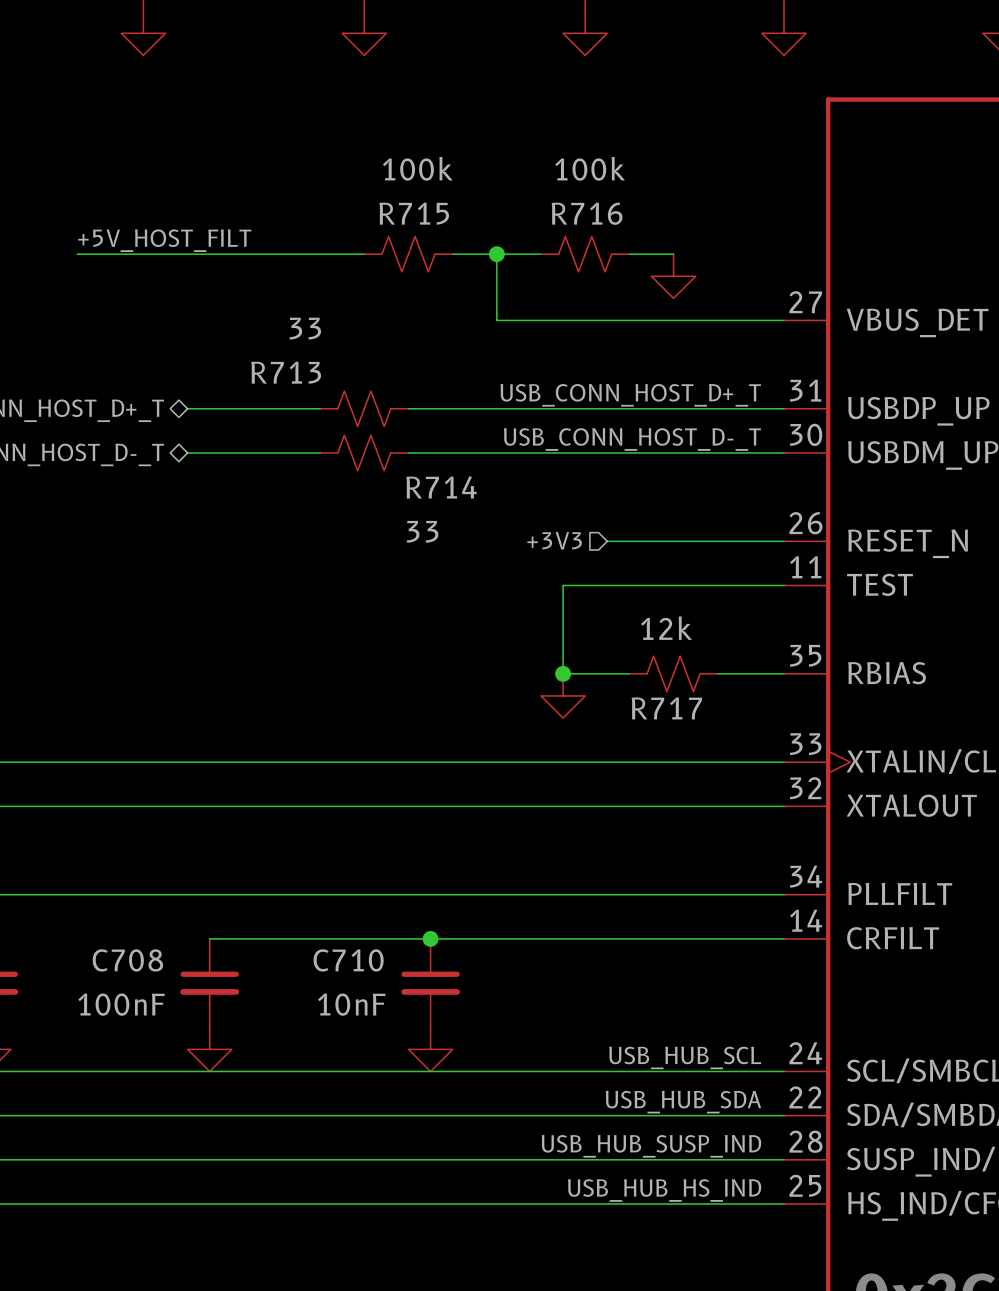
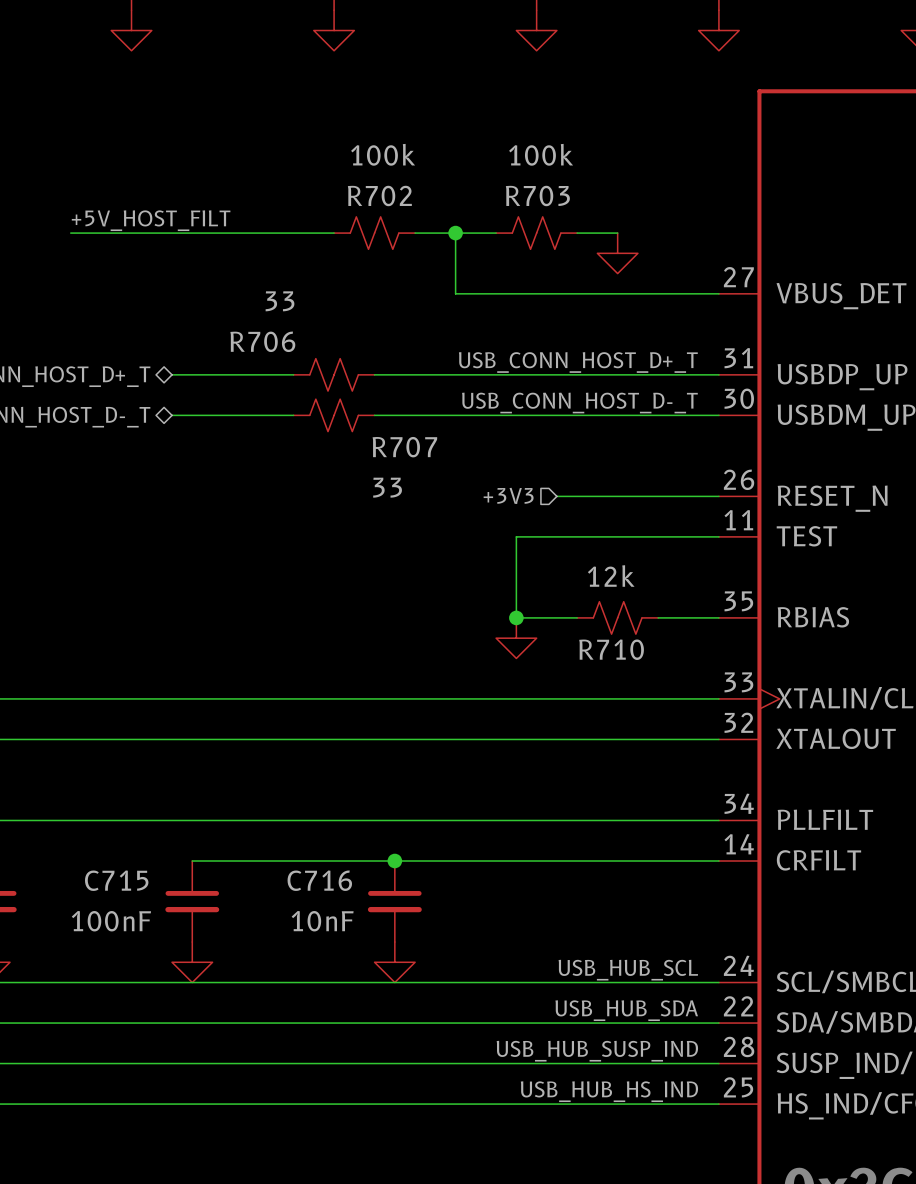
R715 name: R715 (414, 213) -> R702 (379, 195)
R716 name: R716 (587, 213) -> R703 (537, 195)
R713 name: R713 (286, 372) -> R706 (262, 341)
R714 name: R714 (441, 487) -> R707 (404, 447)
R717 name: R717 (666, 708) -> R710 (611, 649)
C708 name: C708 (127, 960) -> C715 (116, 880)
C710 name: C710 (348, 960) -> C716 (319, 880)

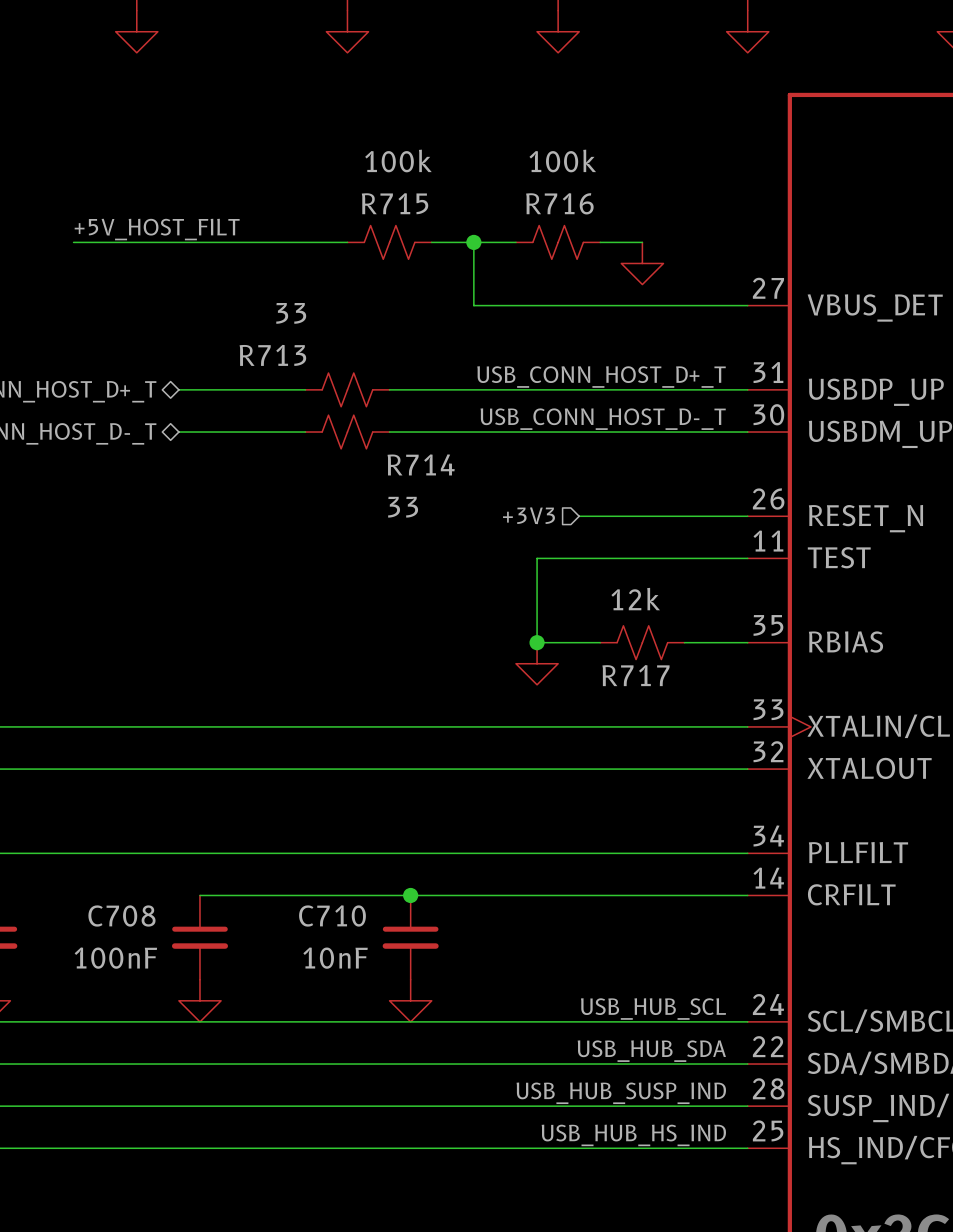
R702 name: R702 (379, 195) -> R715 (395, 203)
R703 name: R703 (537, 195) -> R716 (559, 203)
R706 name: R706 (262, 341) -> R713 (272, 355)
R707 name: R707 (404, 447) -> R714 (421, 464)
R710 name: R710 (611, 649) -> R717 (635, 675)
C715 name: C715 (116, 880) -> C708 (121, 916)
C716 name: C716 (319, 880) -> C710 (332, 915)

